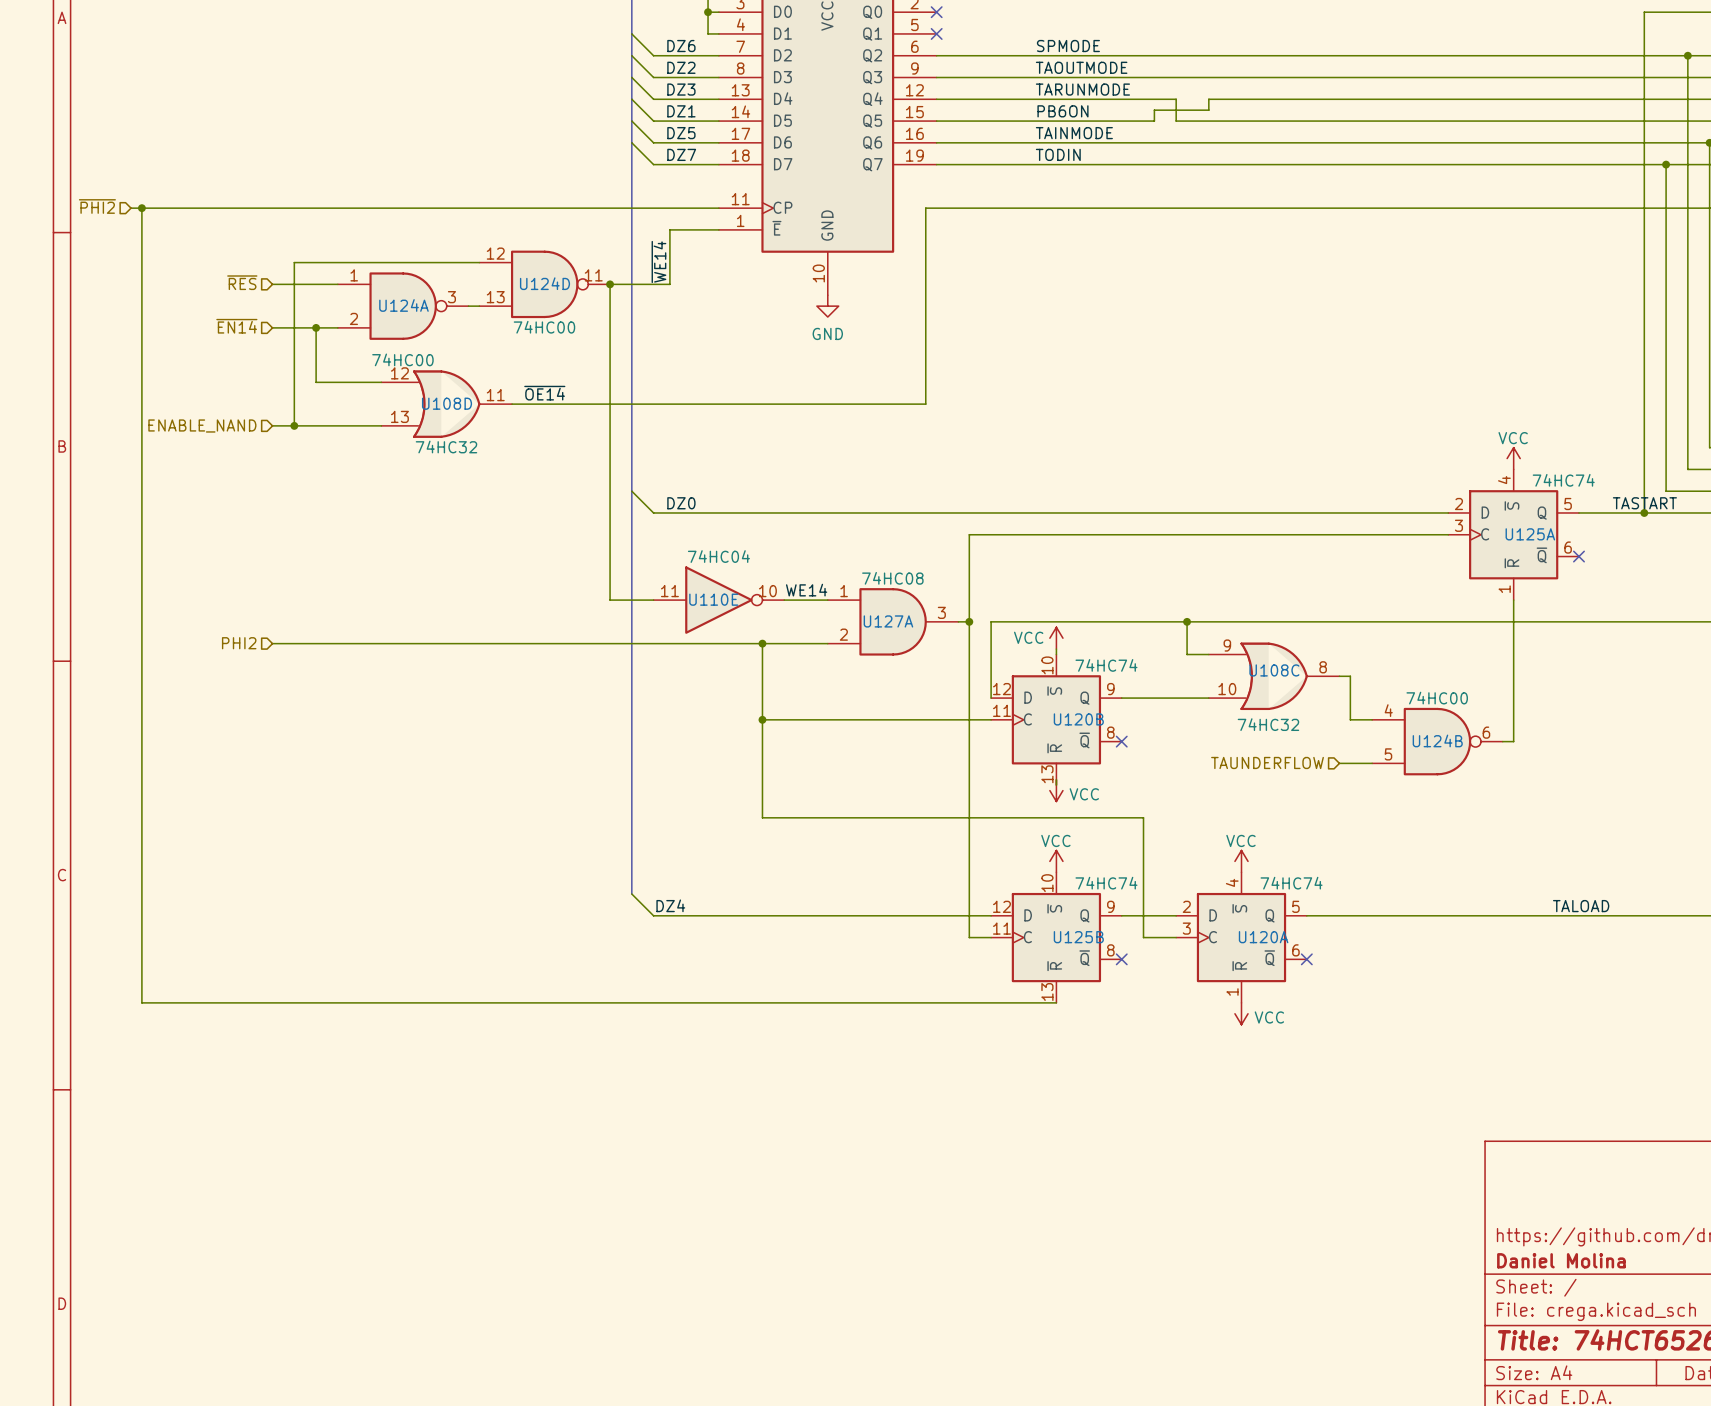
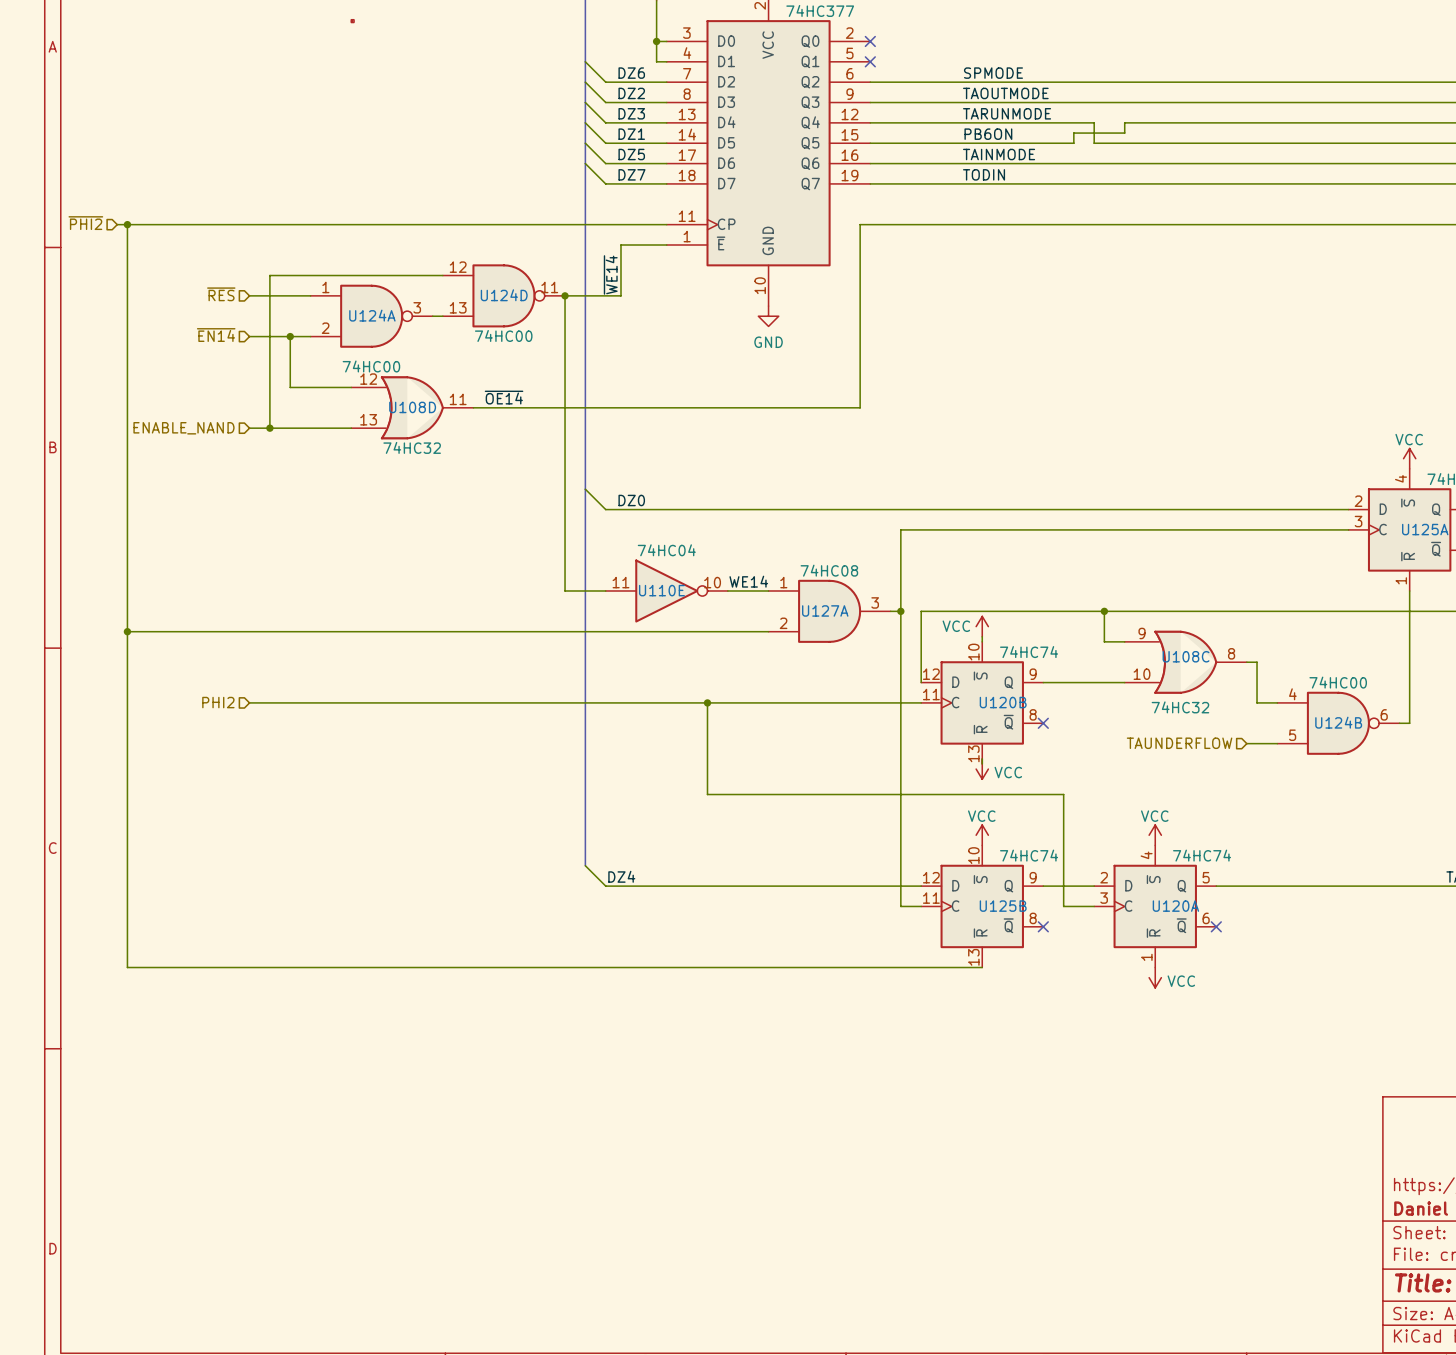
wire: none -> (127, 631) (249, 631)
junction: none -> (127, 631)
hierarchical label position: PHI2 (239, 643) -> PHI2 (218, 702)
wire: (762, 643) (762, 719) -> (249, 702) (707, 702)
junction: (762, 643) -> none

